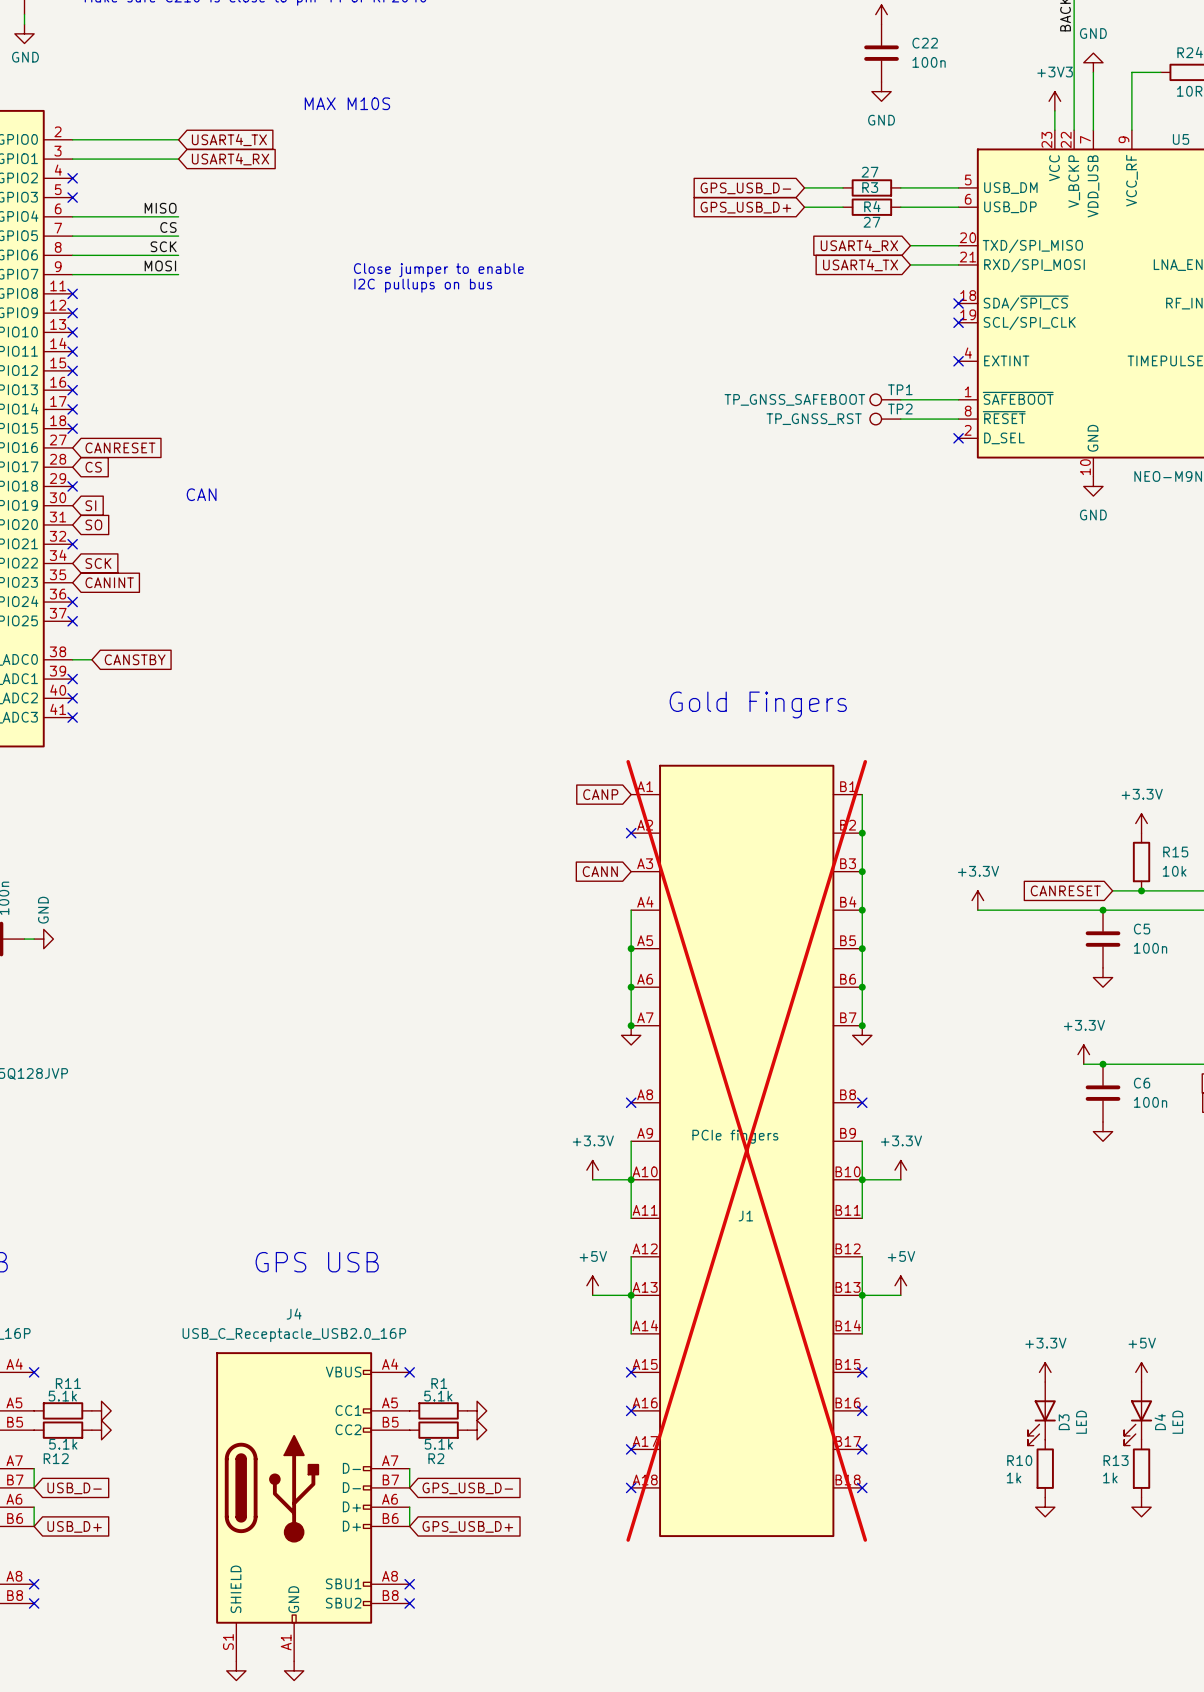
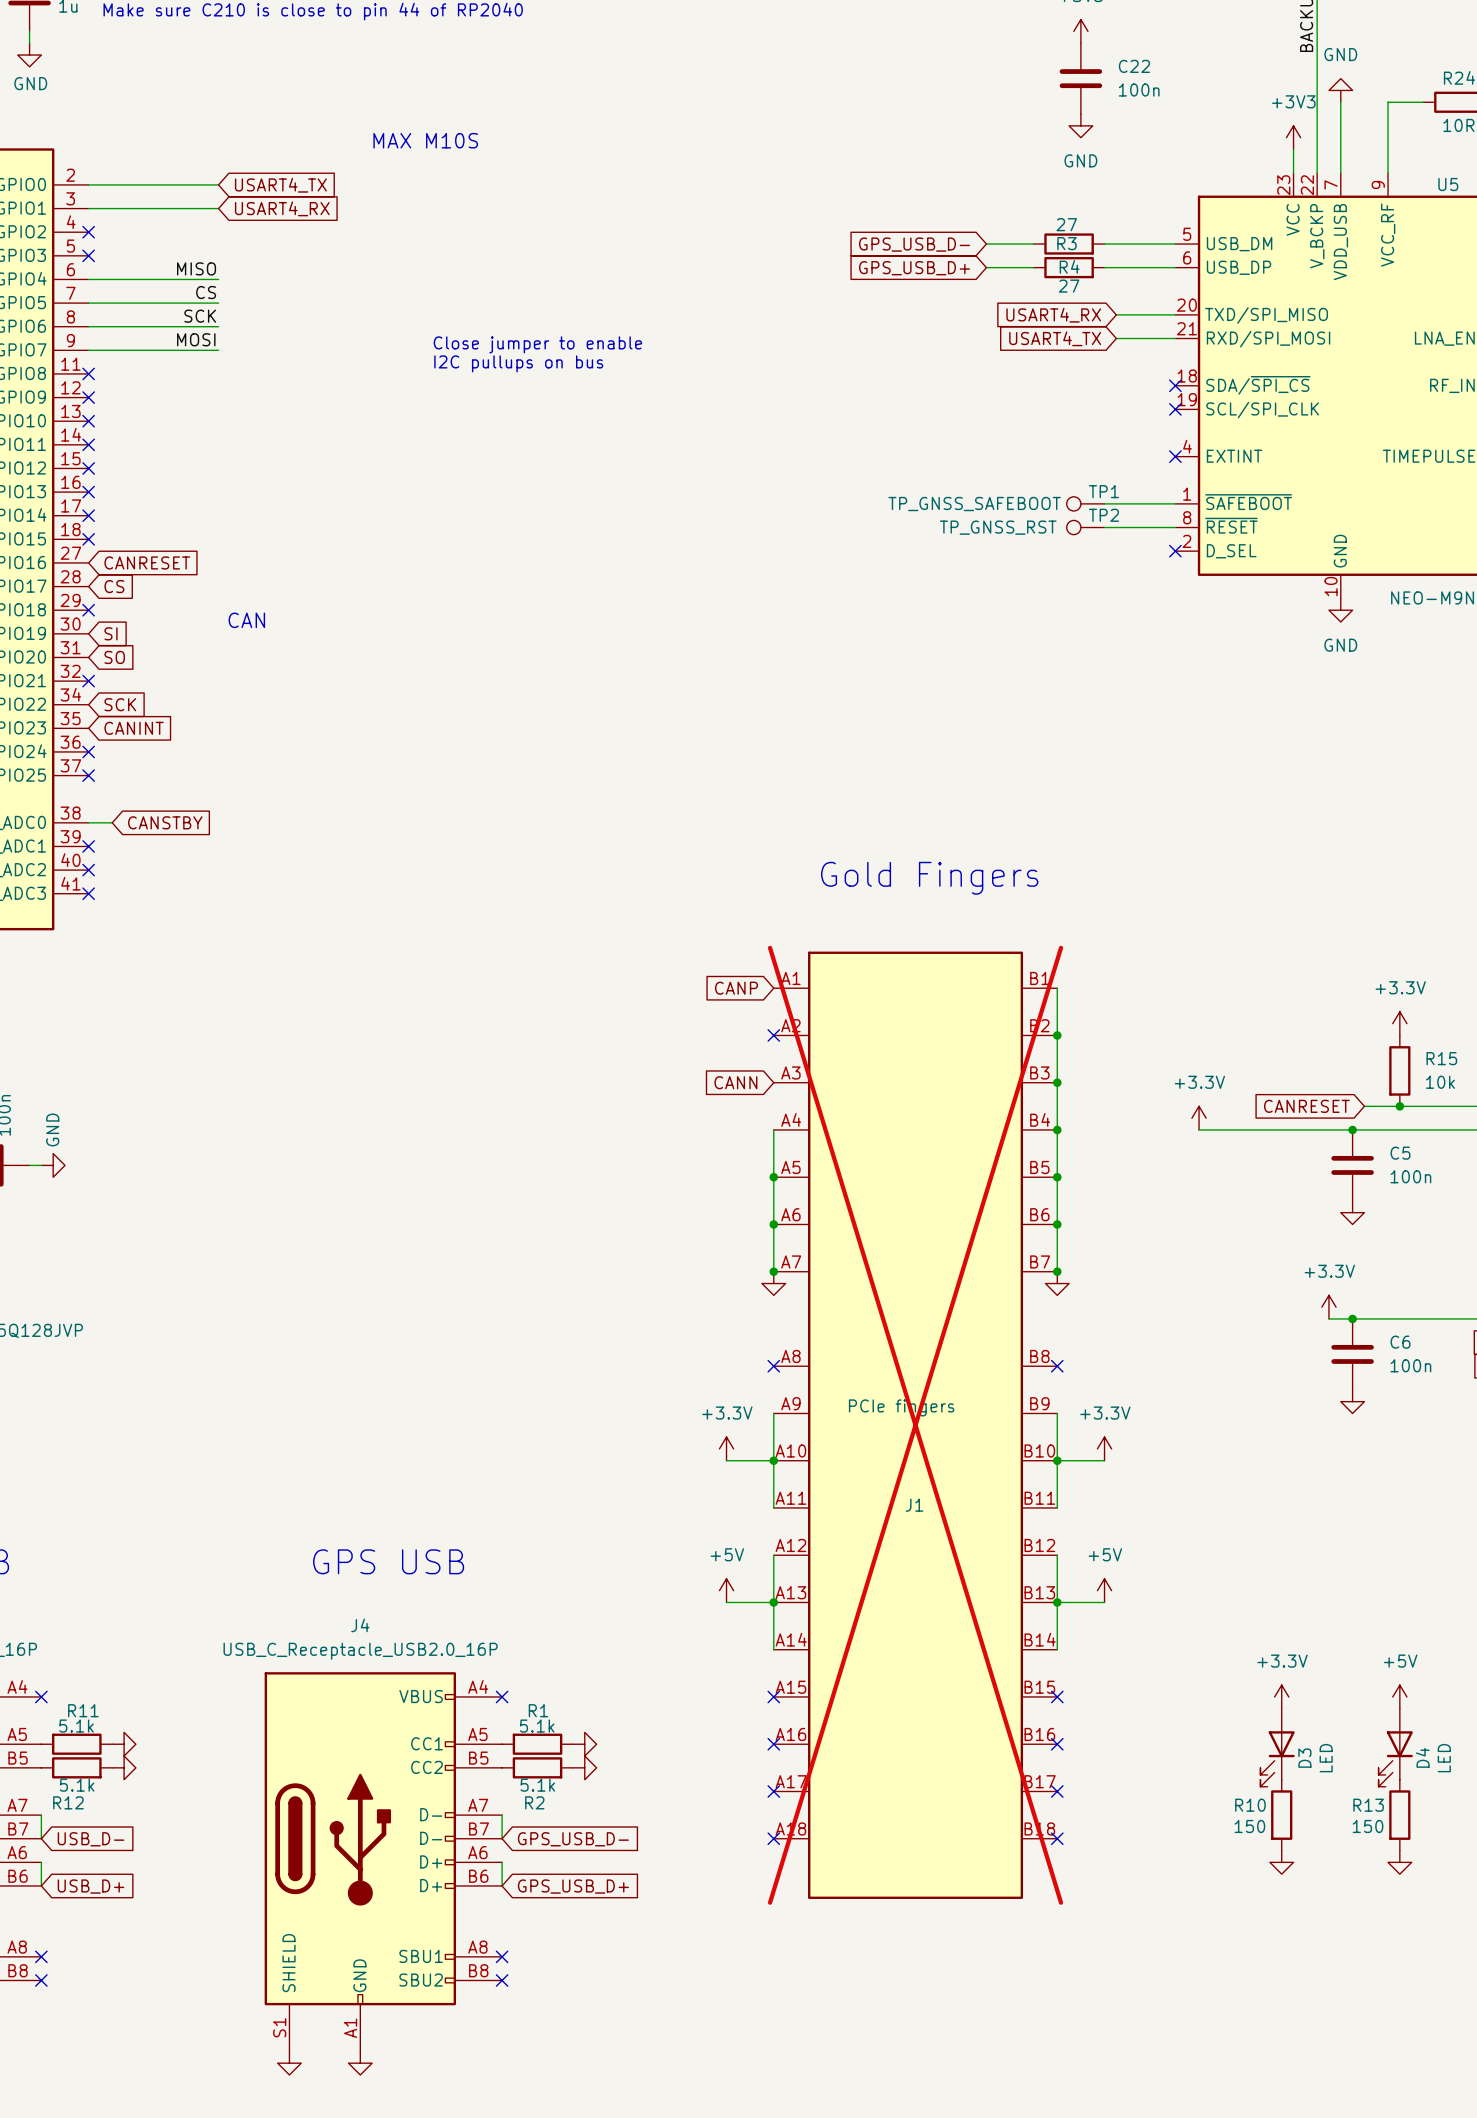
R10 value: 1k (1014, 1477) -> 150 (1249, 1826)
R13 value: 1k (1110, 1477) -> 150 (1368, 1826)

